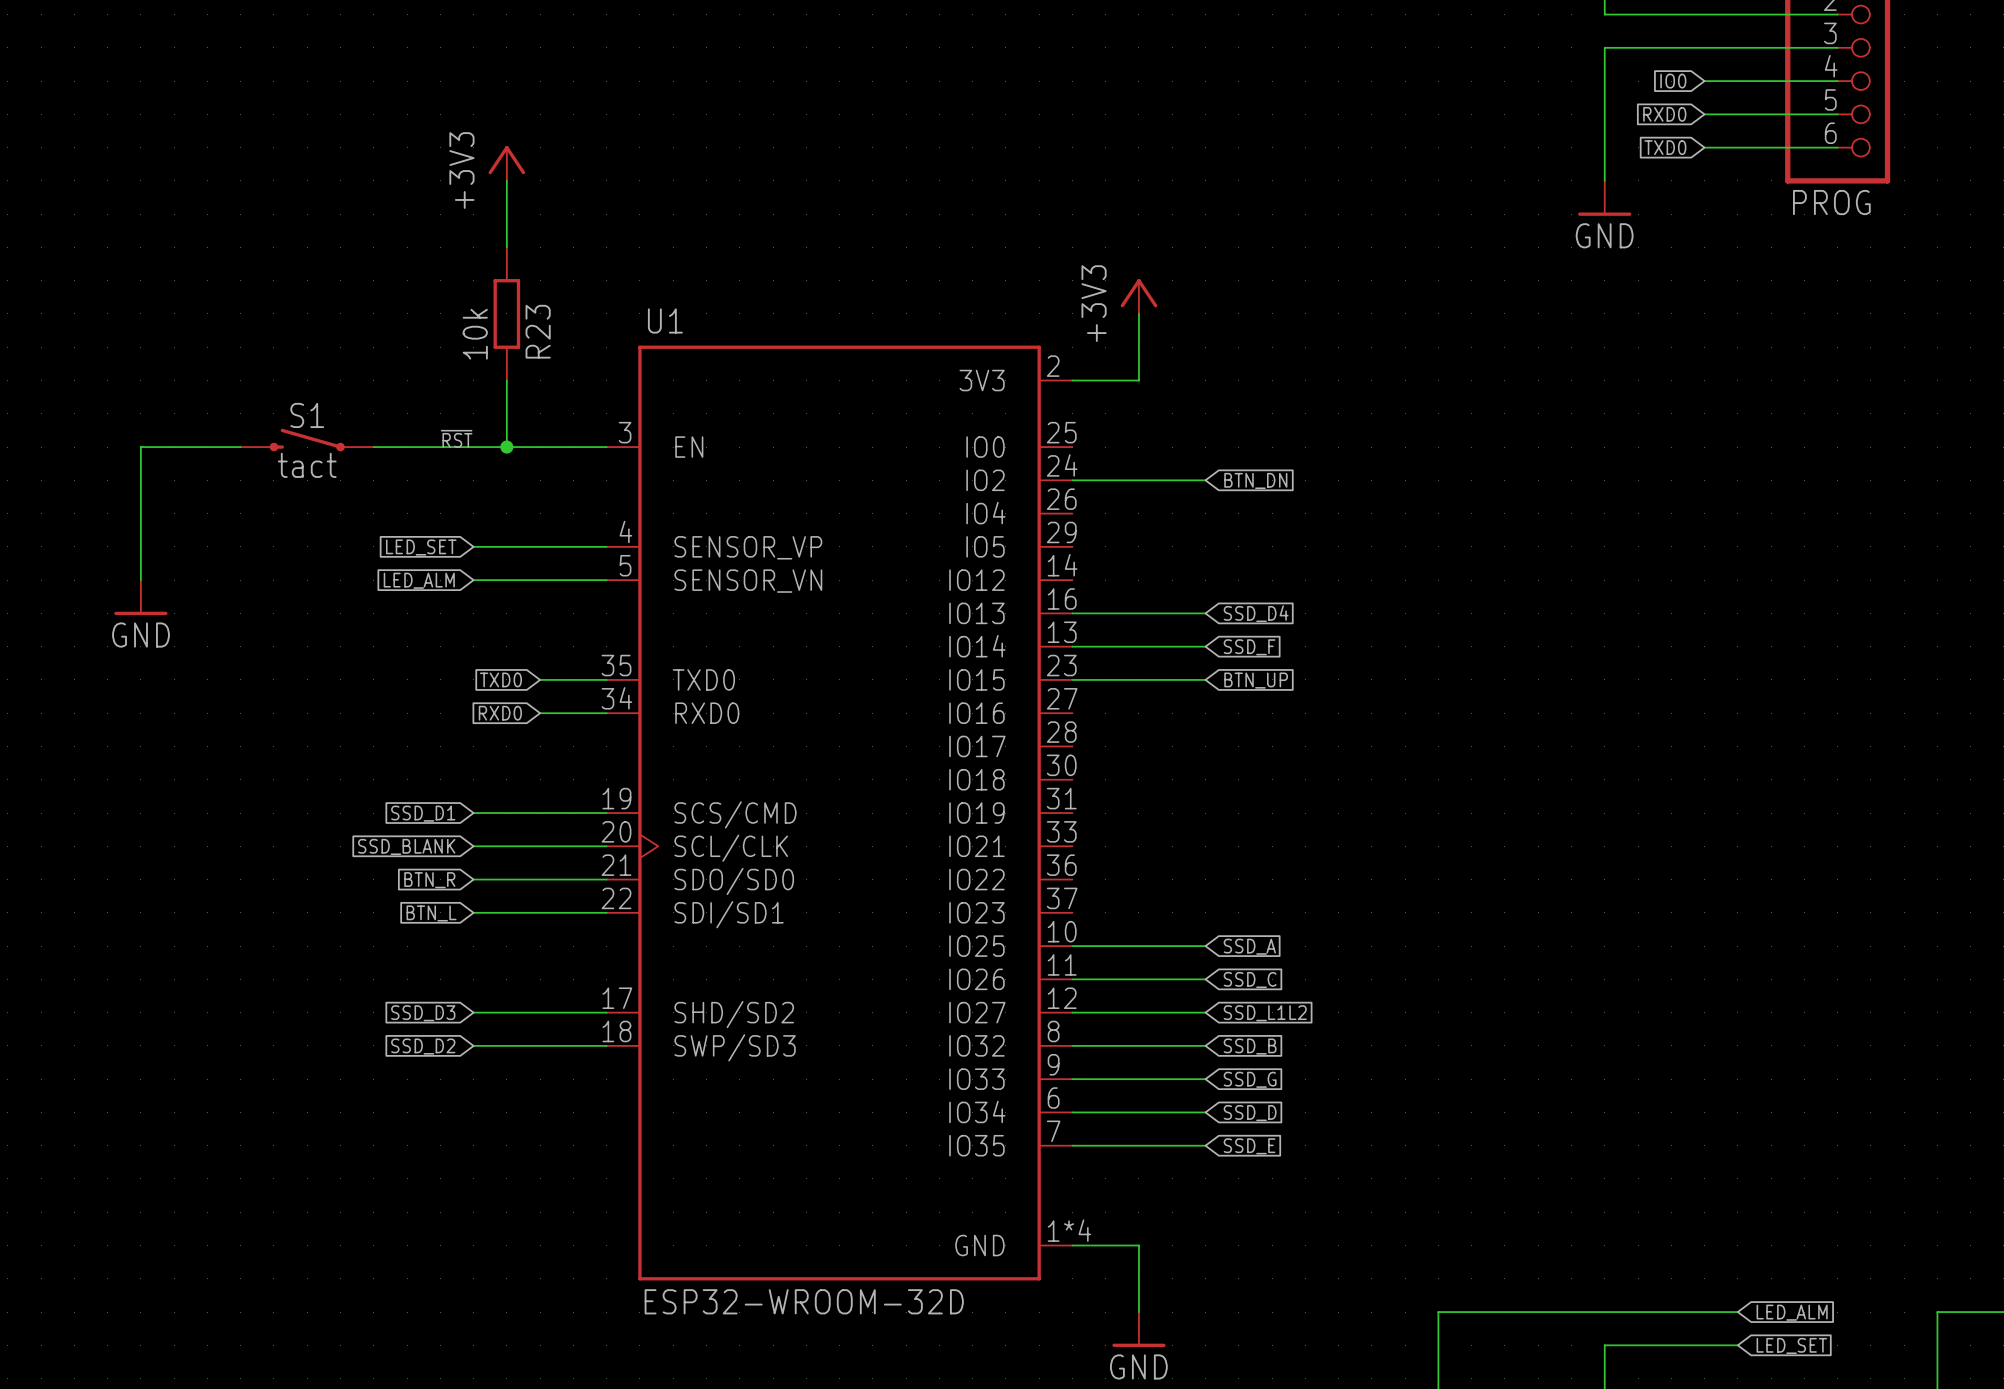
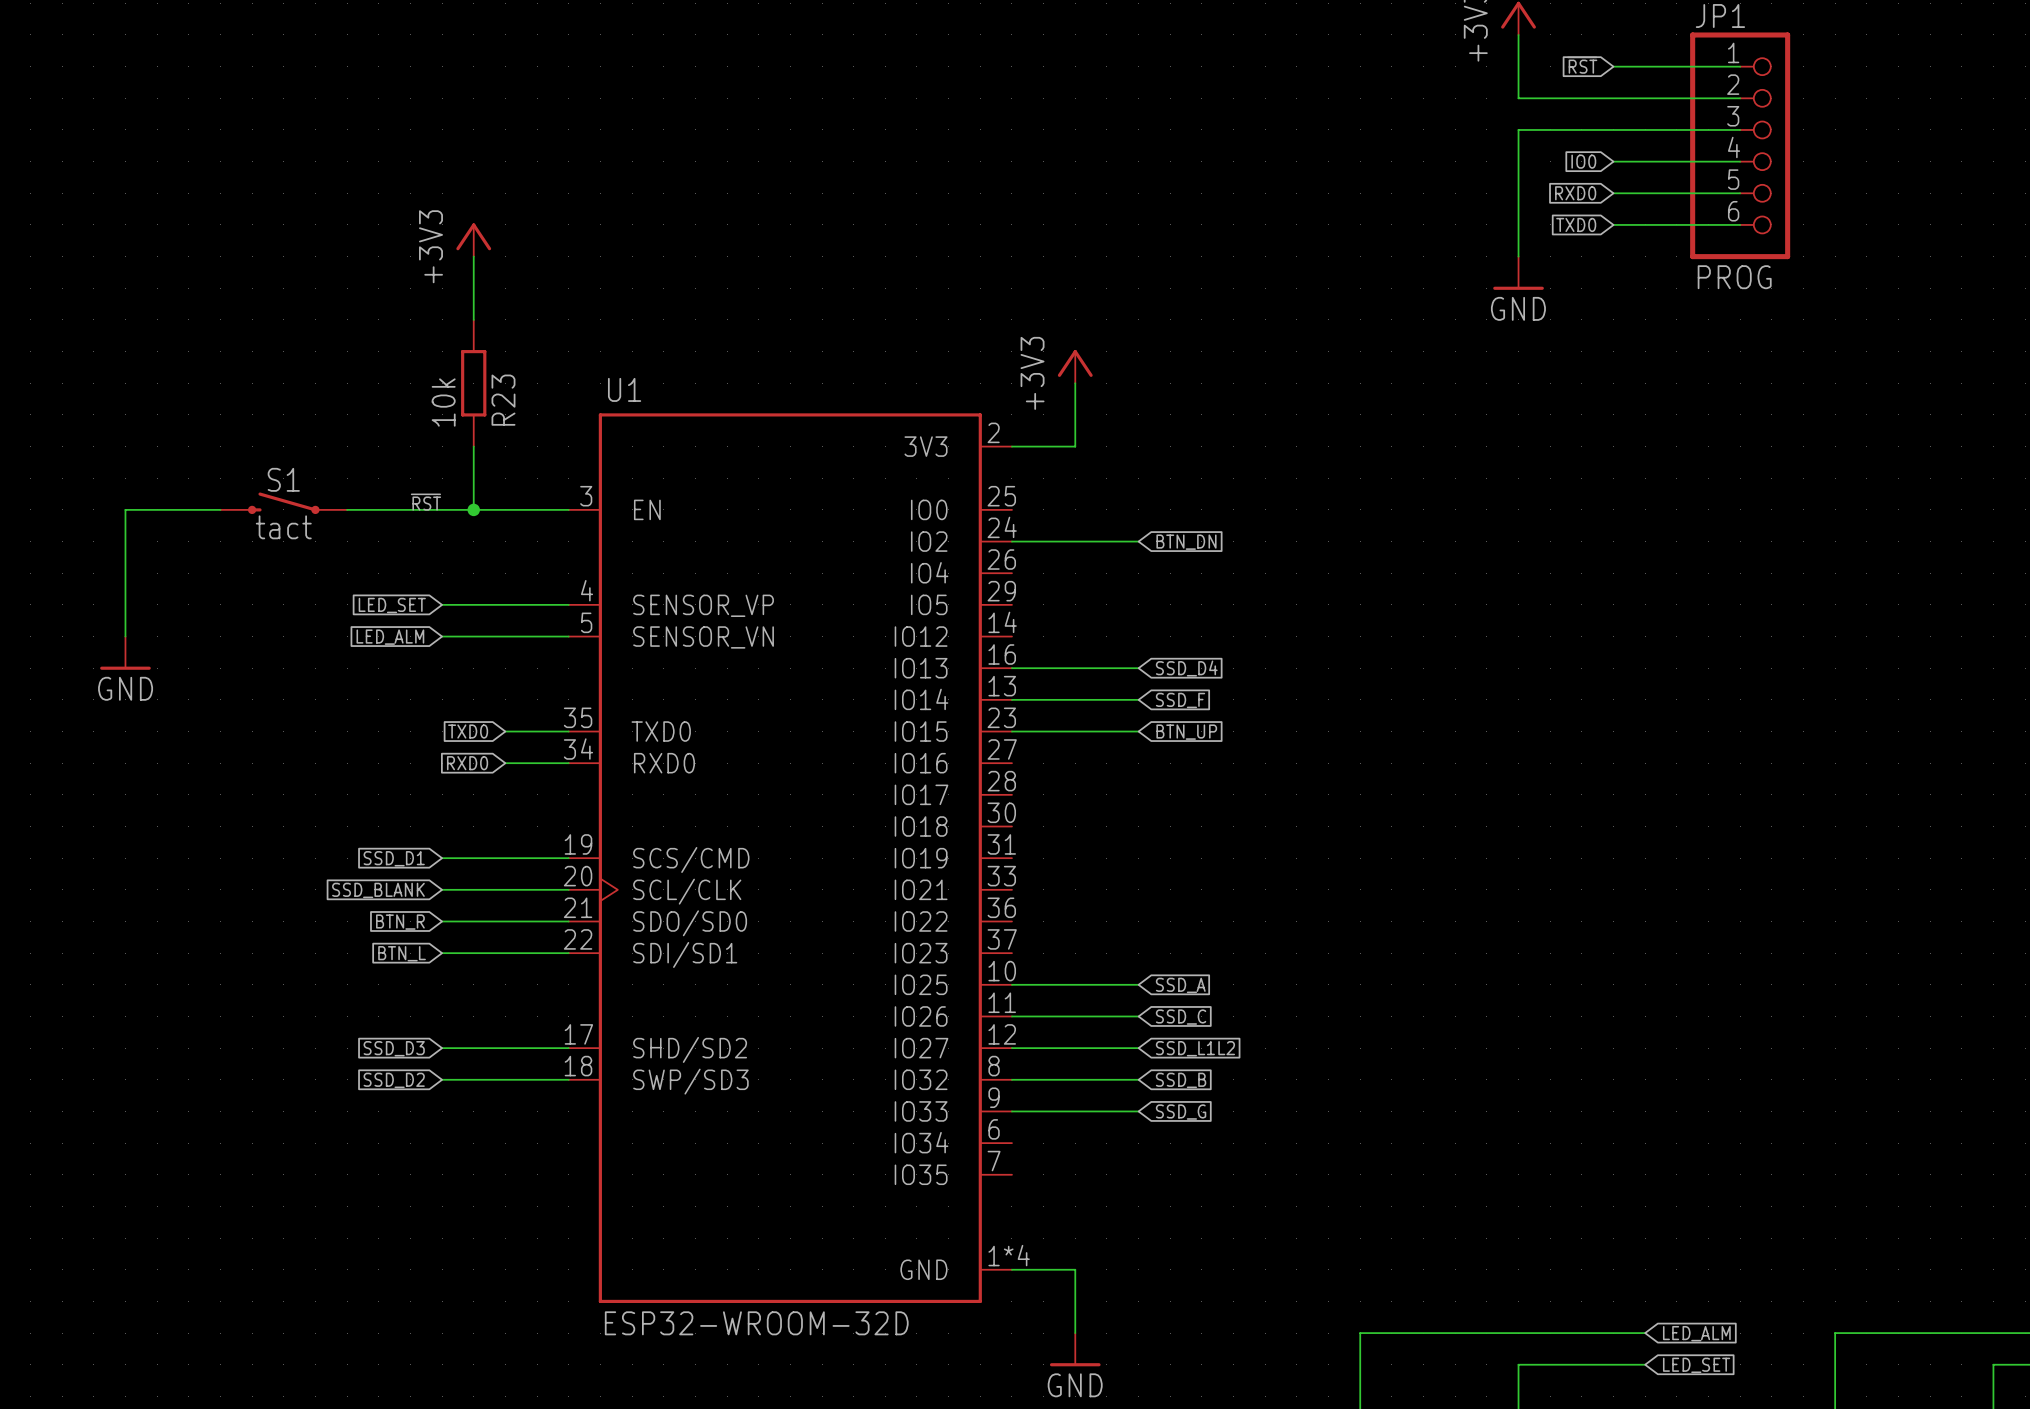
wire: (1072, 1112) (1205, 1112) -> none
global label: SSD_D (1250, 1113) -> none
wire: (1072, 1145) (1205, 1145) -> none
global label: SSD_E (1249, 1146) -> none

